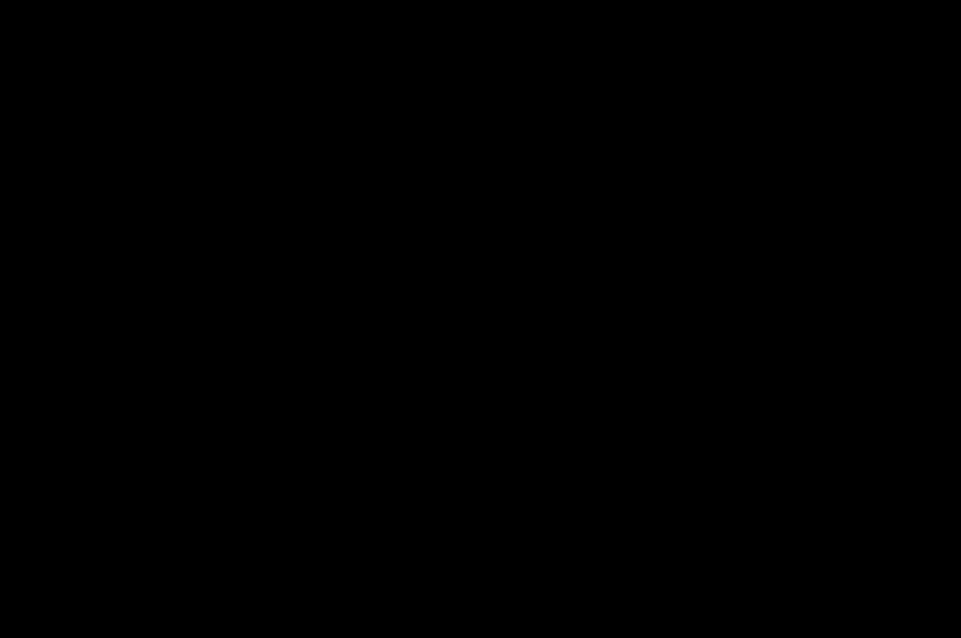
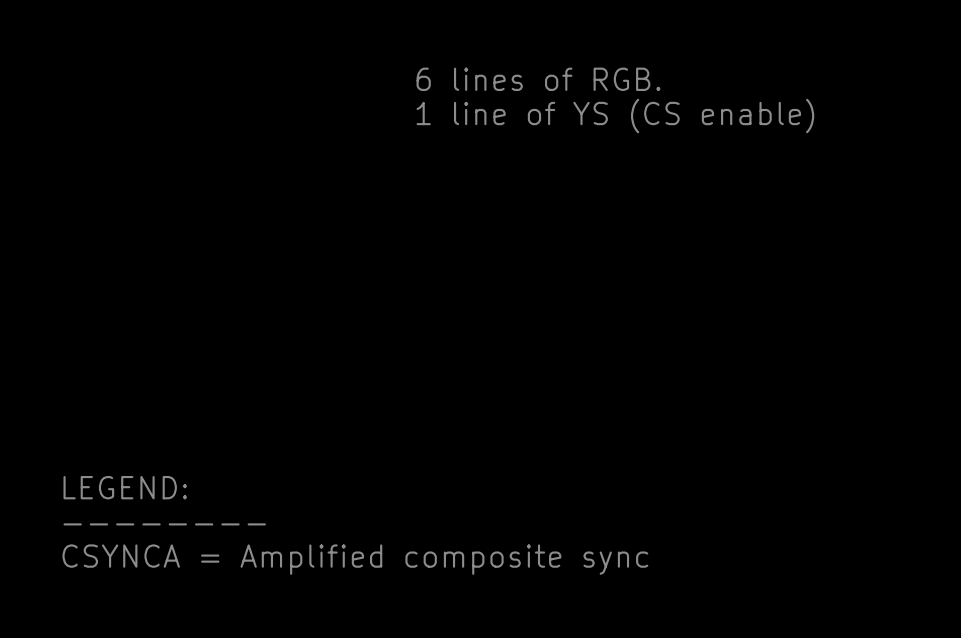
text: none -> 6 lines of RGB. (538, 79)
text: none -> 1 line of YS (CS enable) (615, 116)
text: none -> LEGEND: (125, 487)
text: none -> -------- (164, 524)
text: none -> CSYNCA = Amplified composite sync (355, 559)

